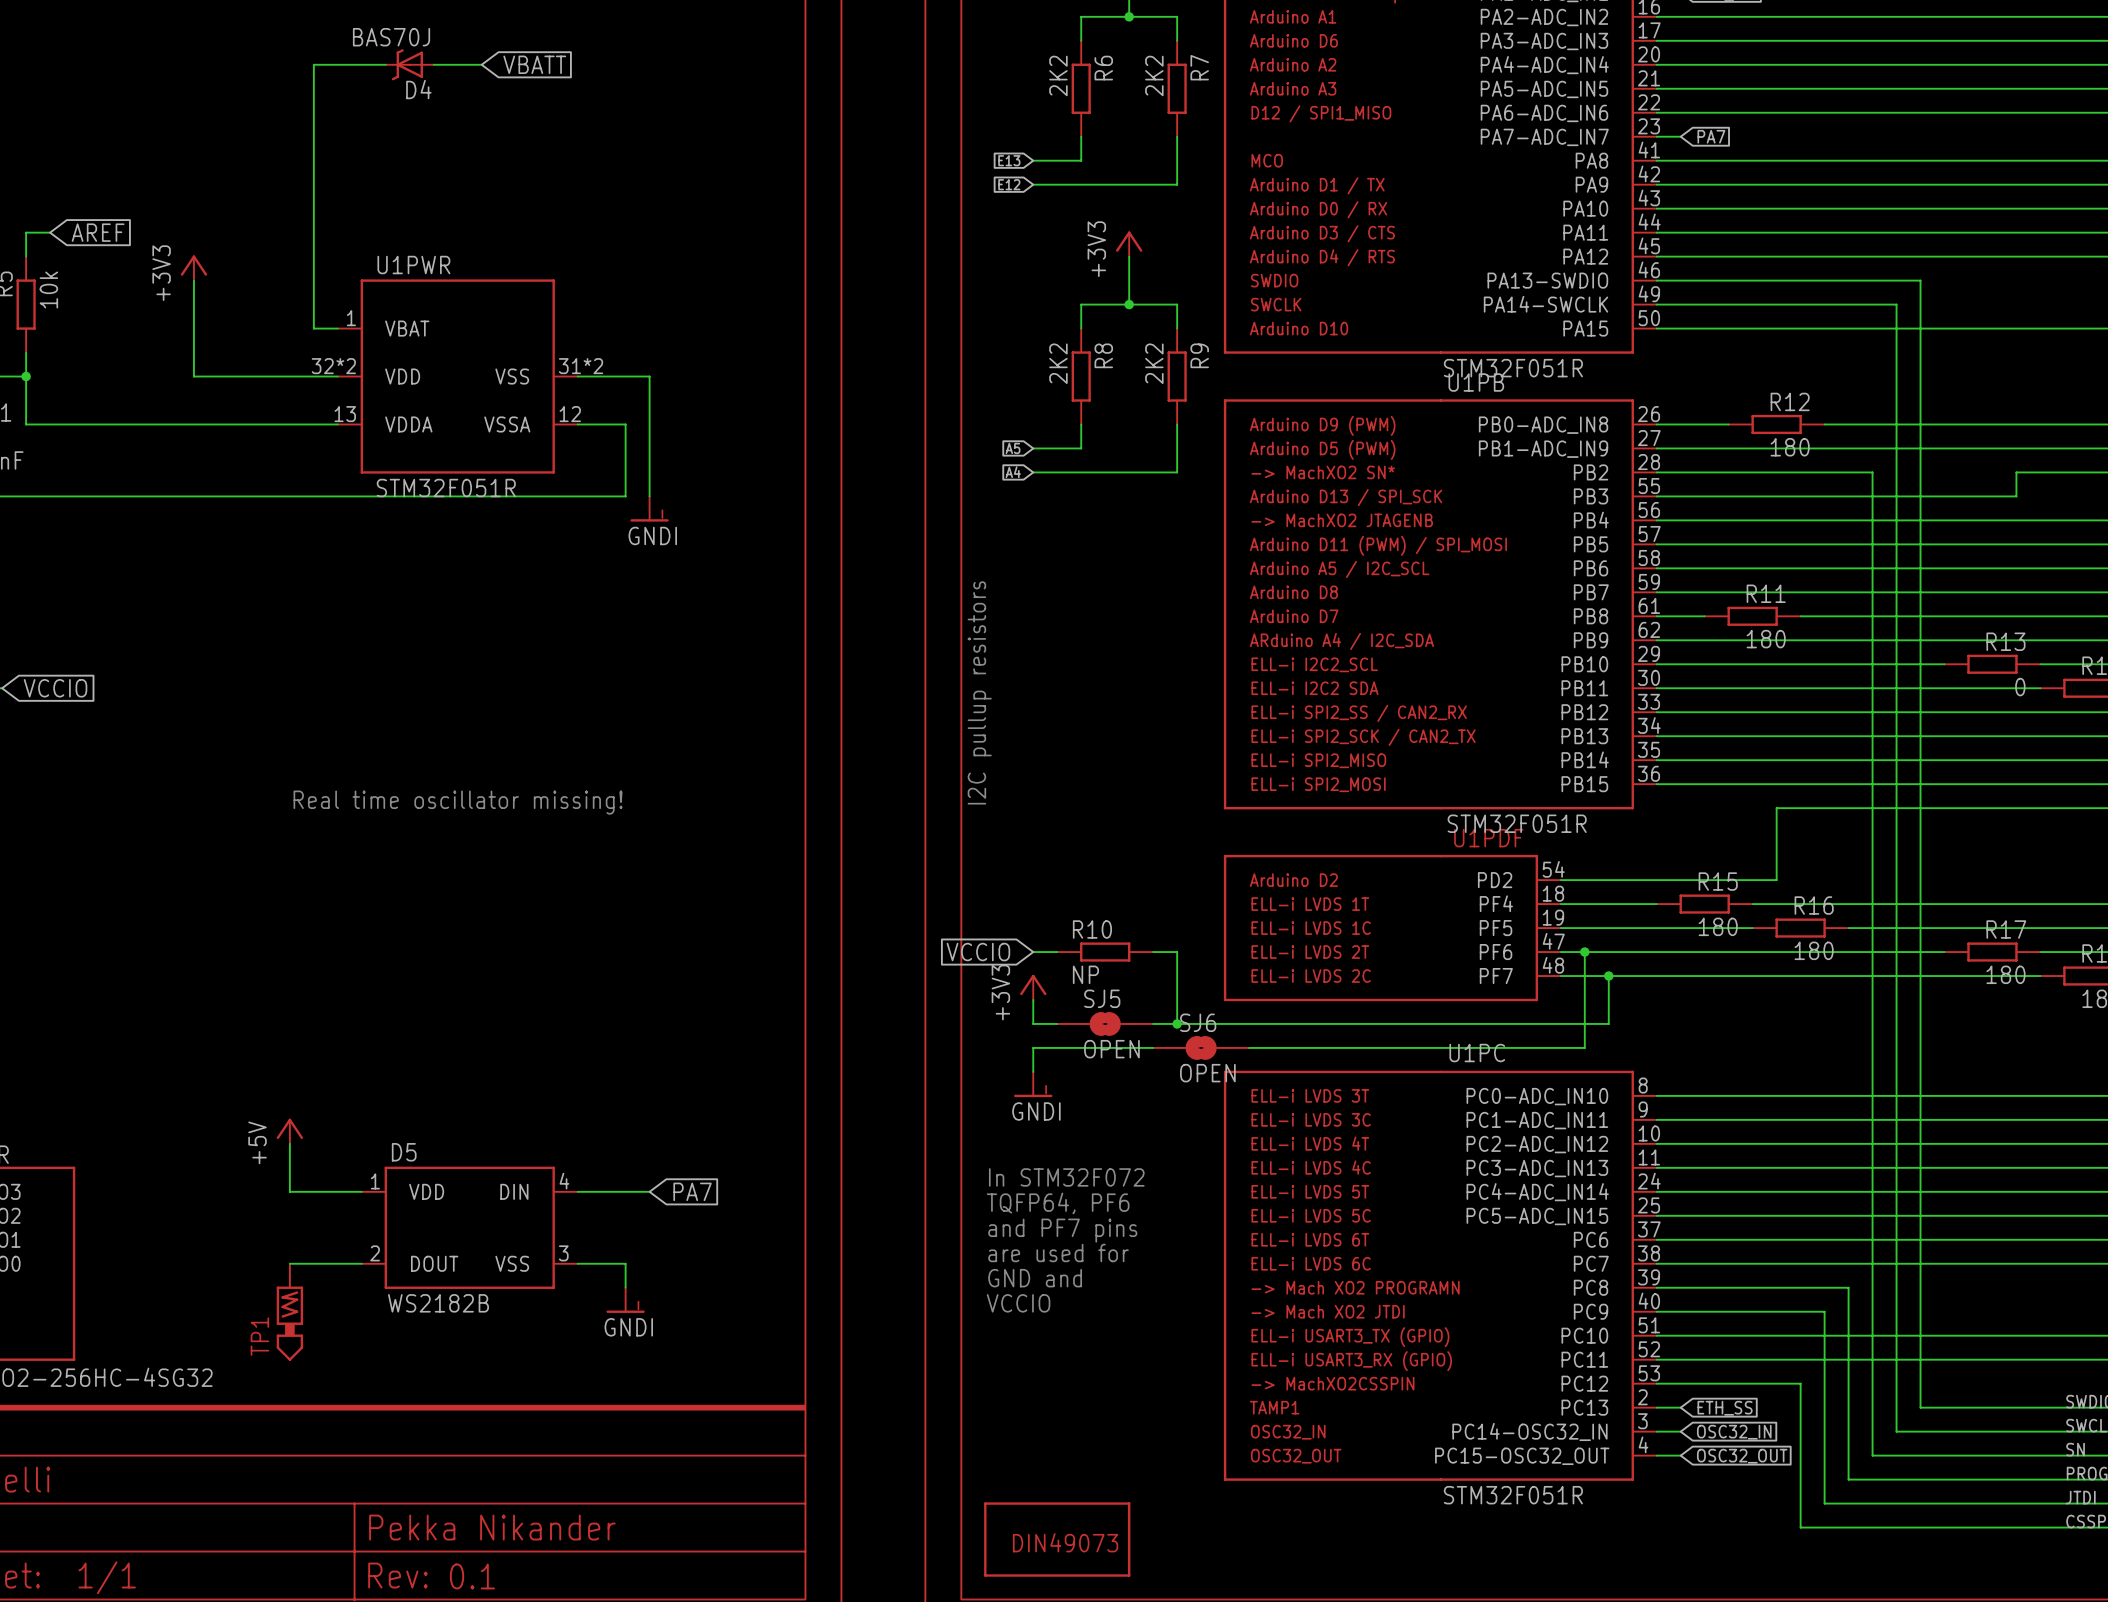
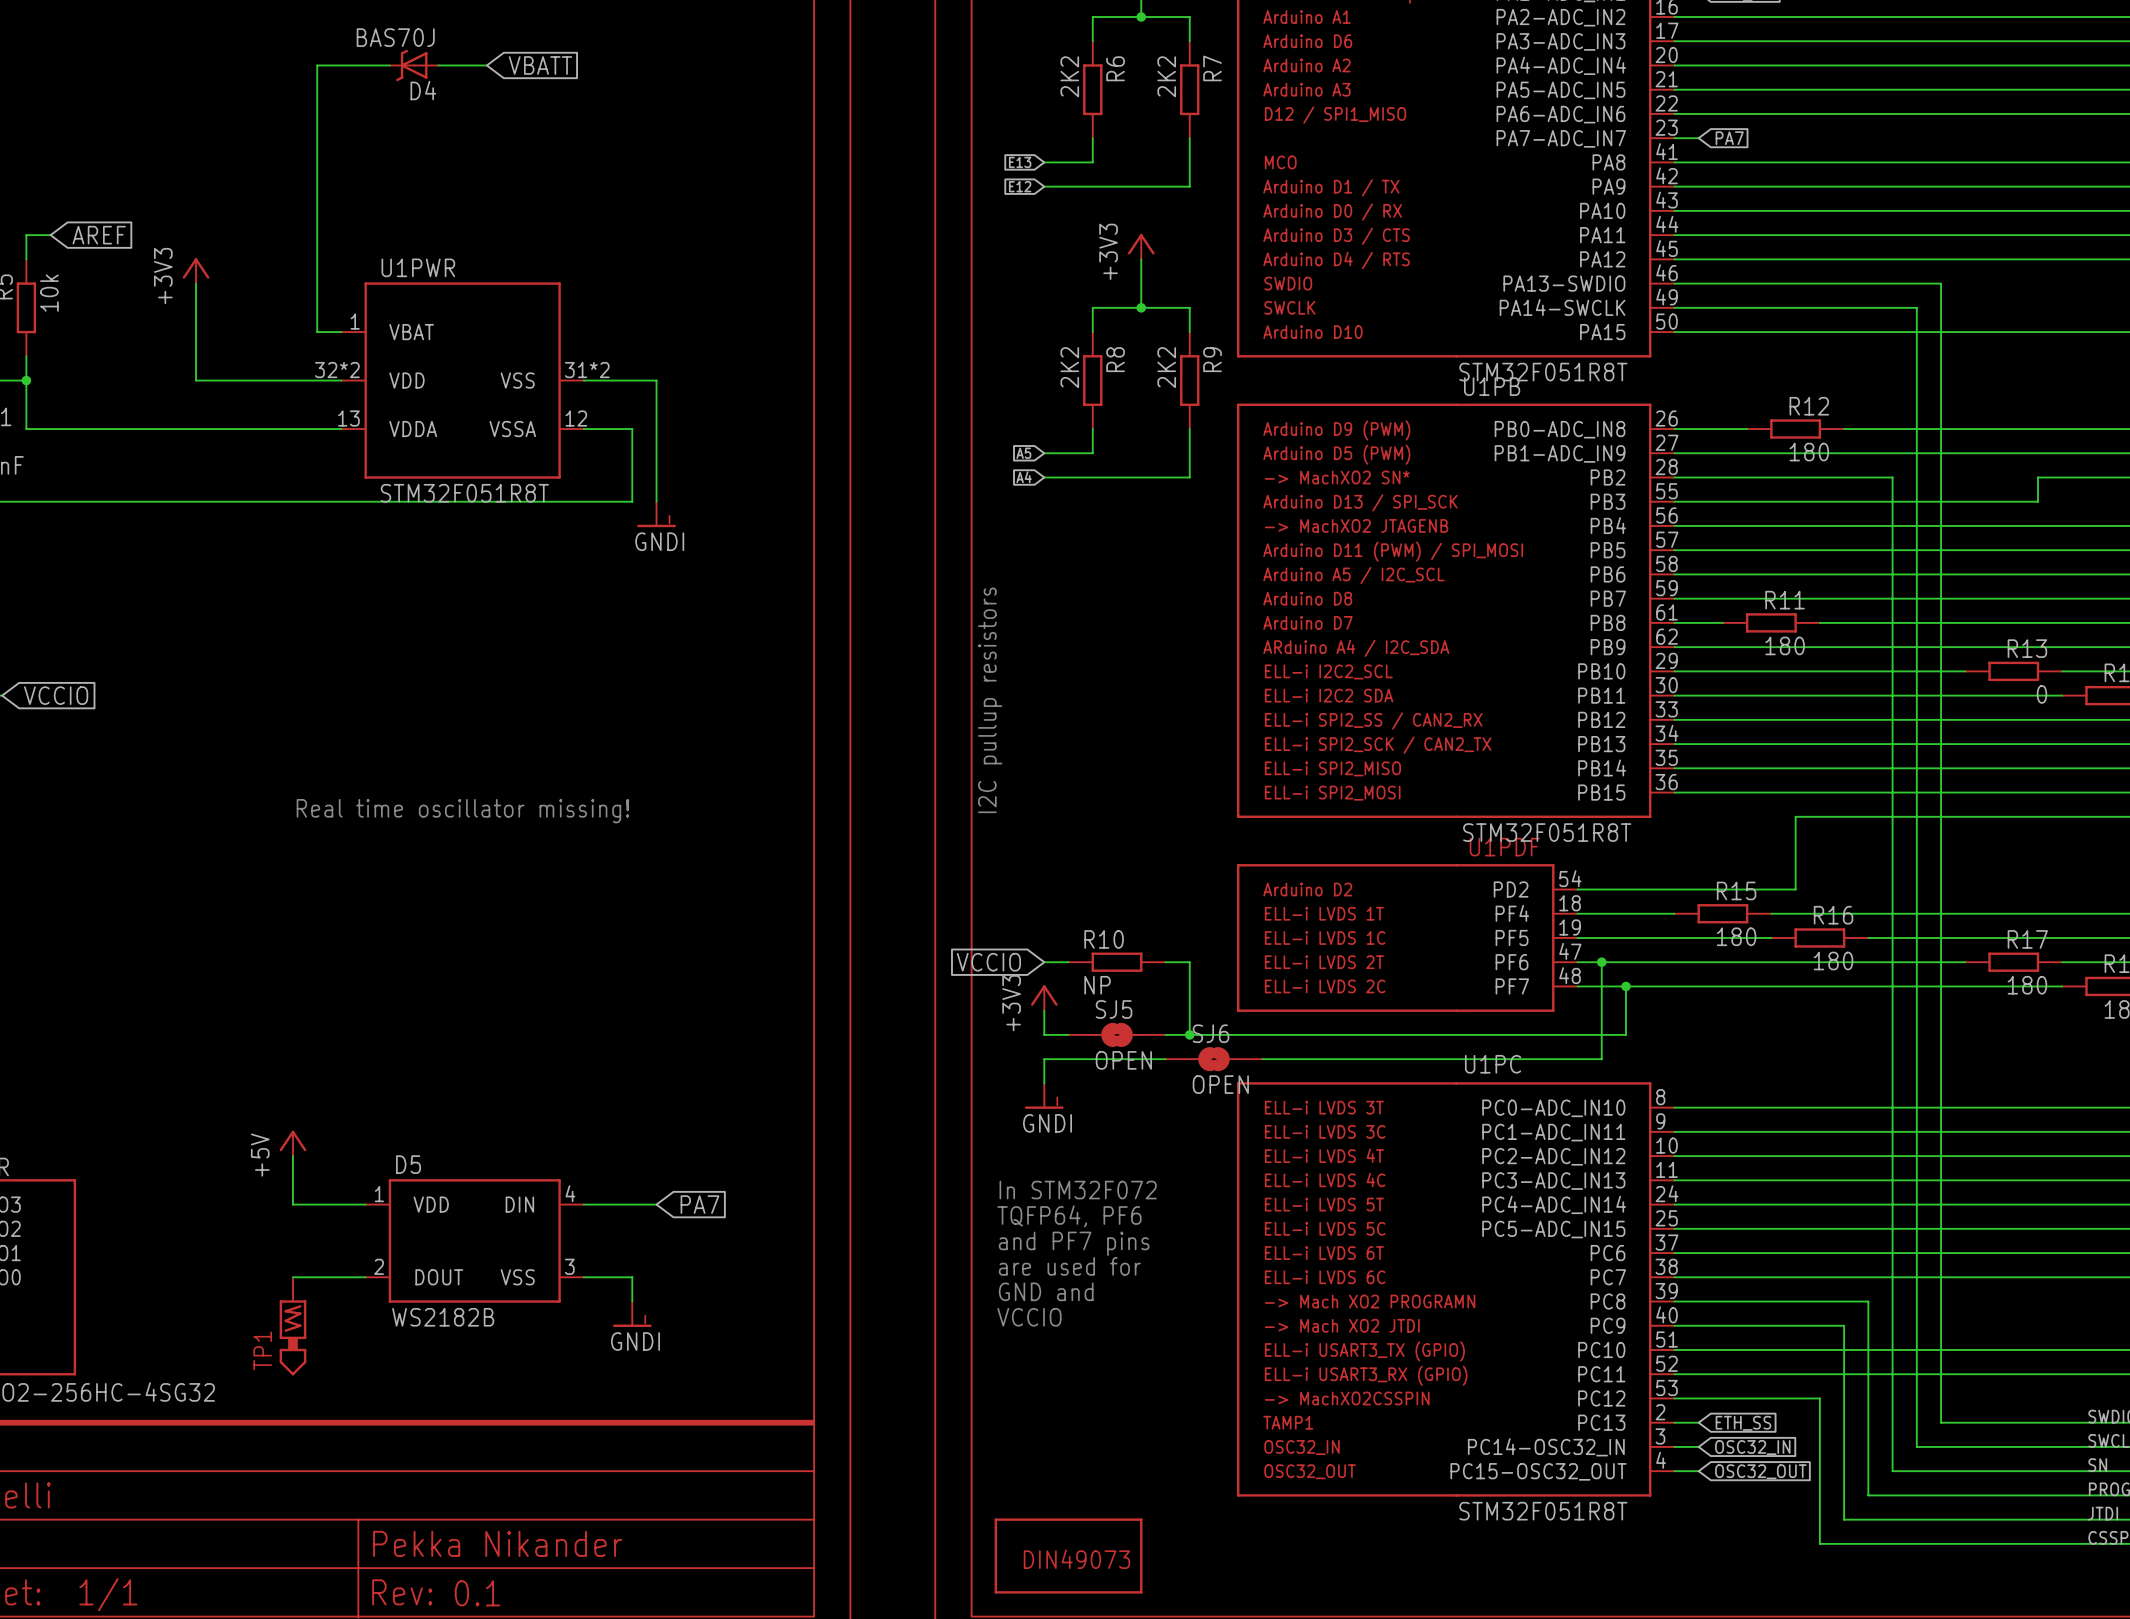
part value: STM32F051R (1513, 368) -> STM32F051R8T (1543, 372)
U1PWR value: STM32F051R (446, 488) -> STM32F051R8T (464, 493)
U1PB value: STM32F051R (1517, 823) -> STM32F051R8T (1547, 832)
U1PC value: STM32F051R (1513, 1495) -> STM32F051R8T (1543, 1511)

